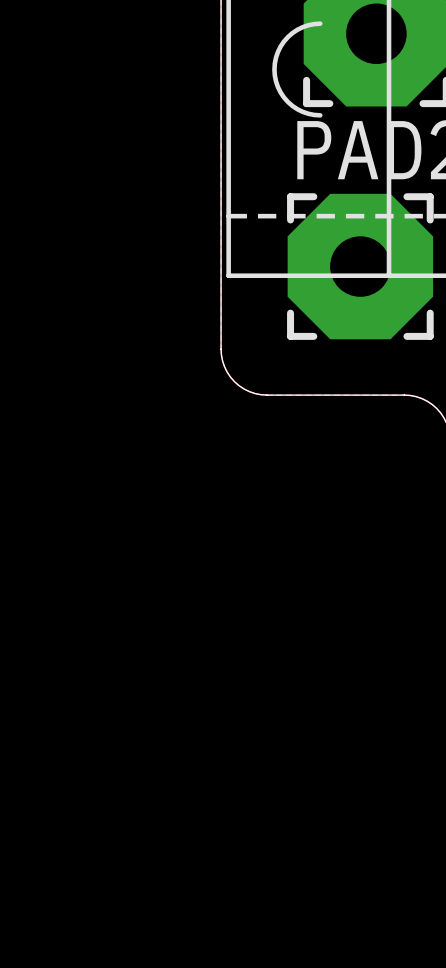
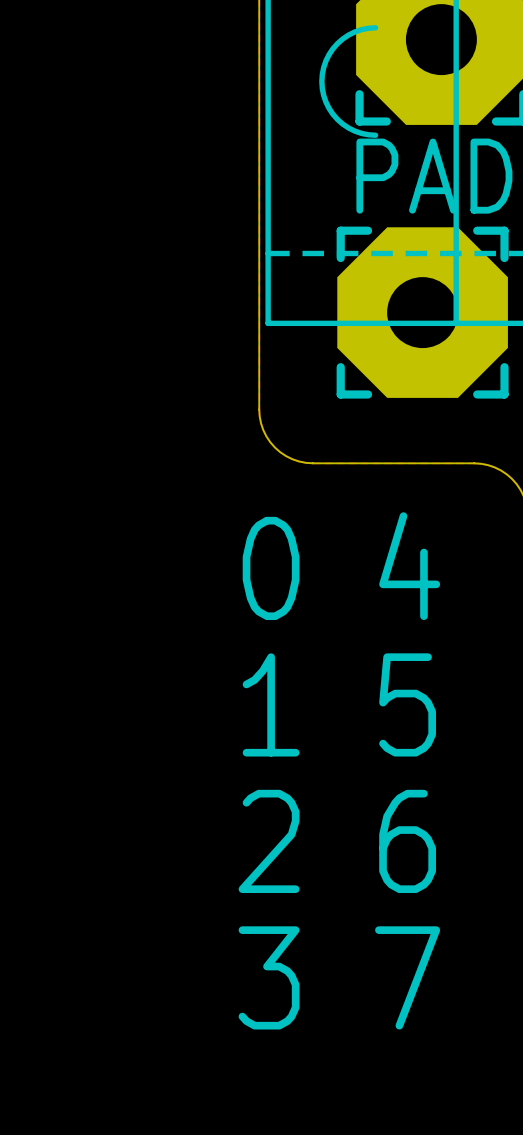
text: none -> 0 (271, 568)
text: none -> 4 (409, 566)
text: none -> 1 (271, 704)
text: none -> 5 (407, 704)
text: none -> 2 (269, 841)
text: none -> 6 (407, 841)
text: none -> 3 (269, 977)
text: none -> 7 (407, 977)

